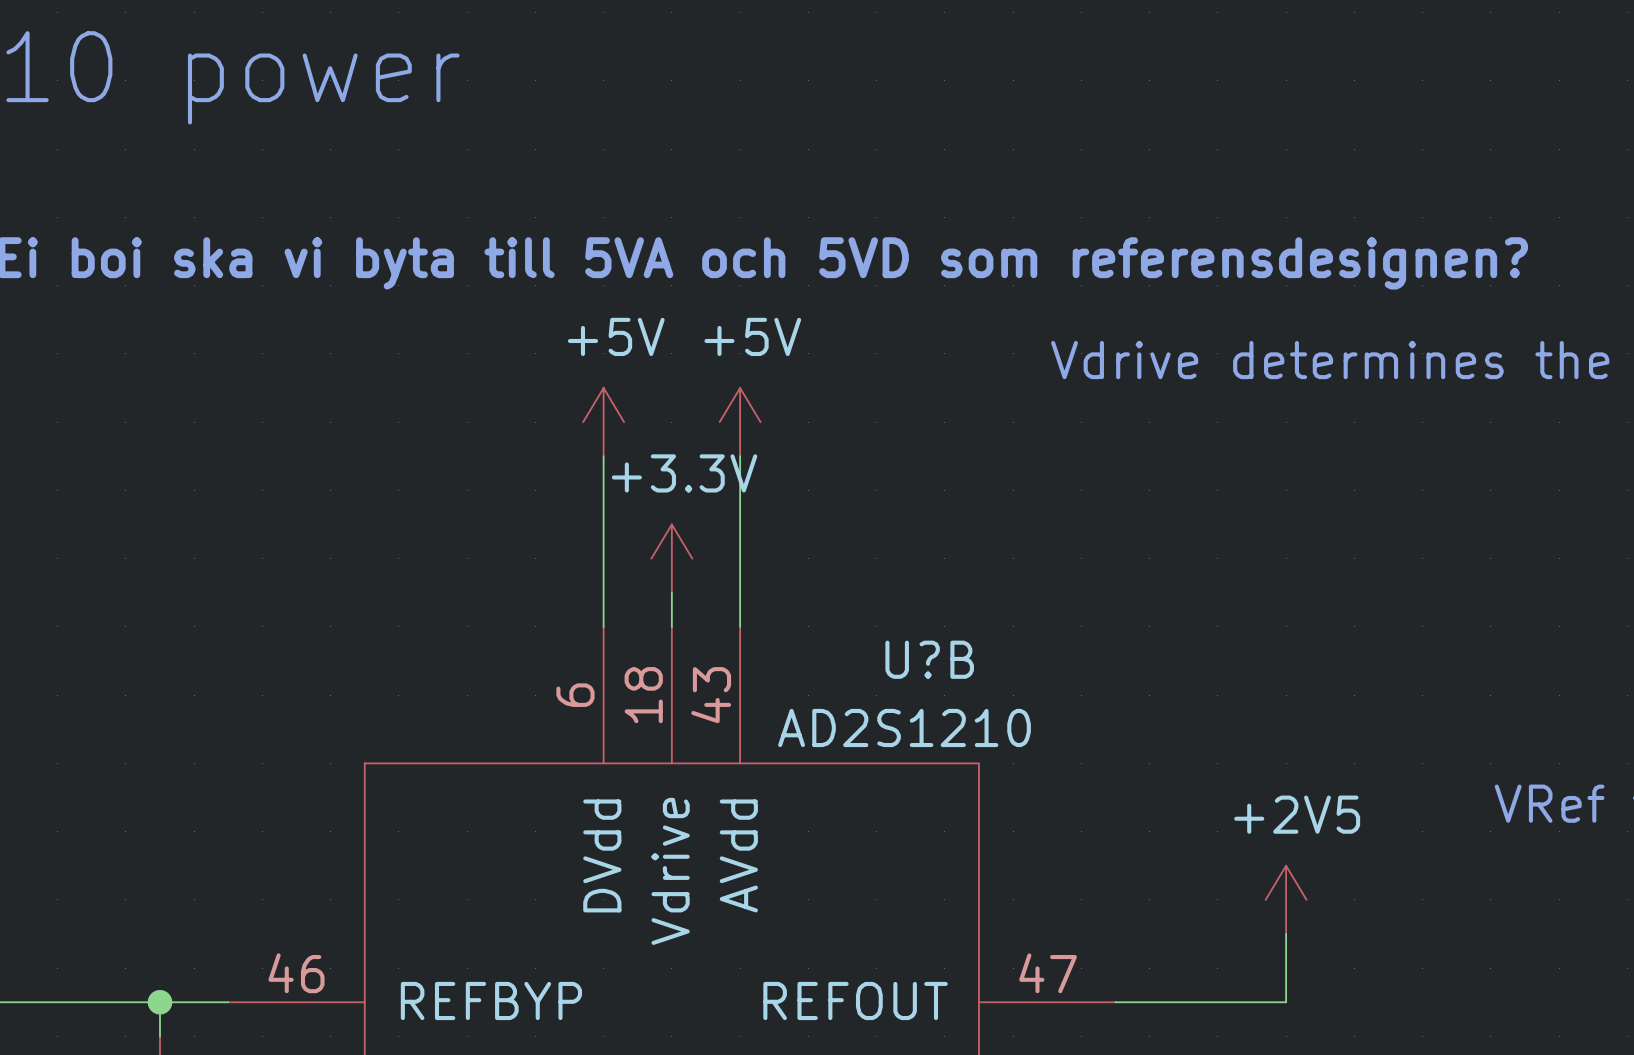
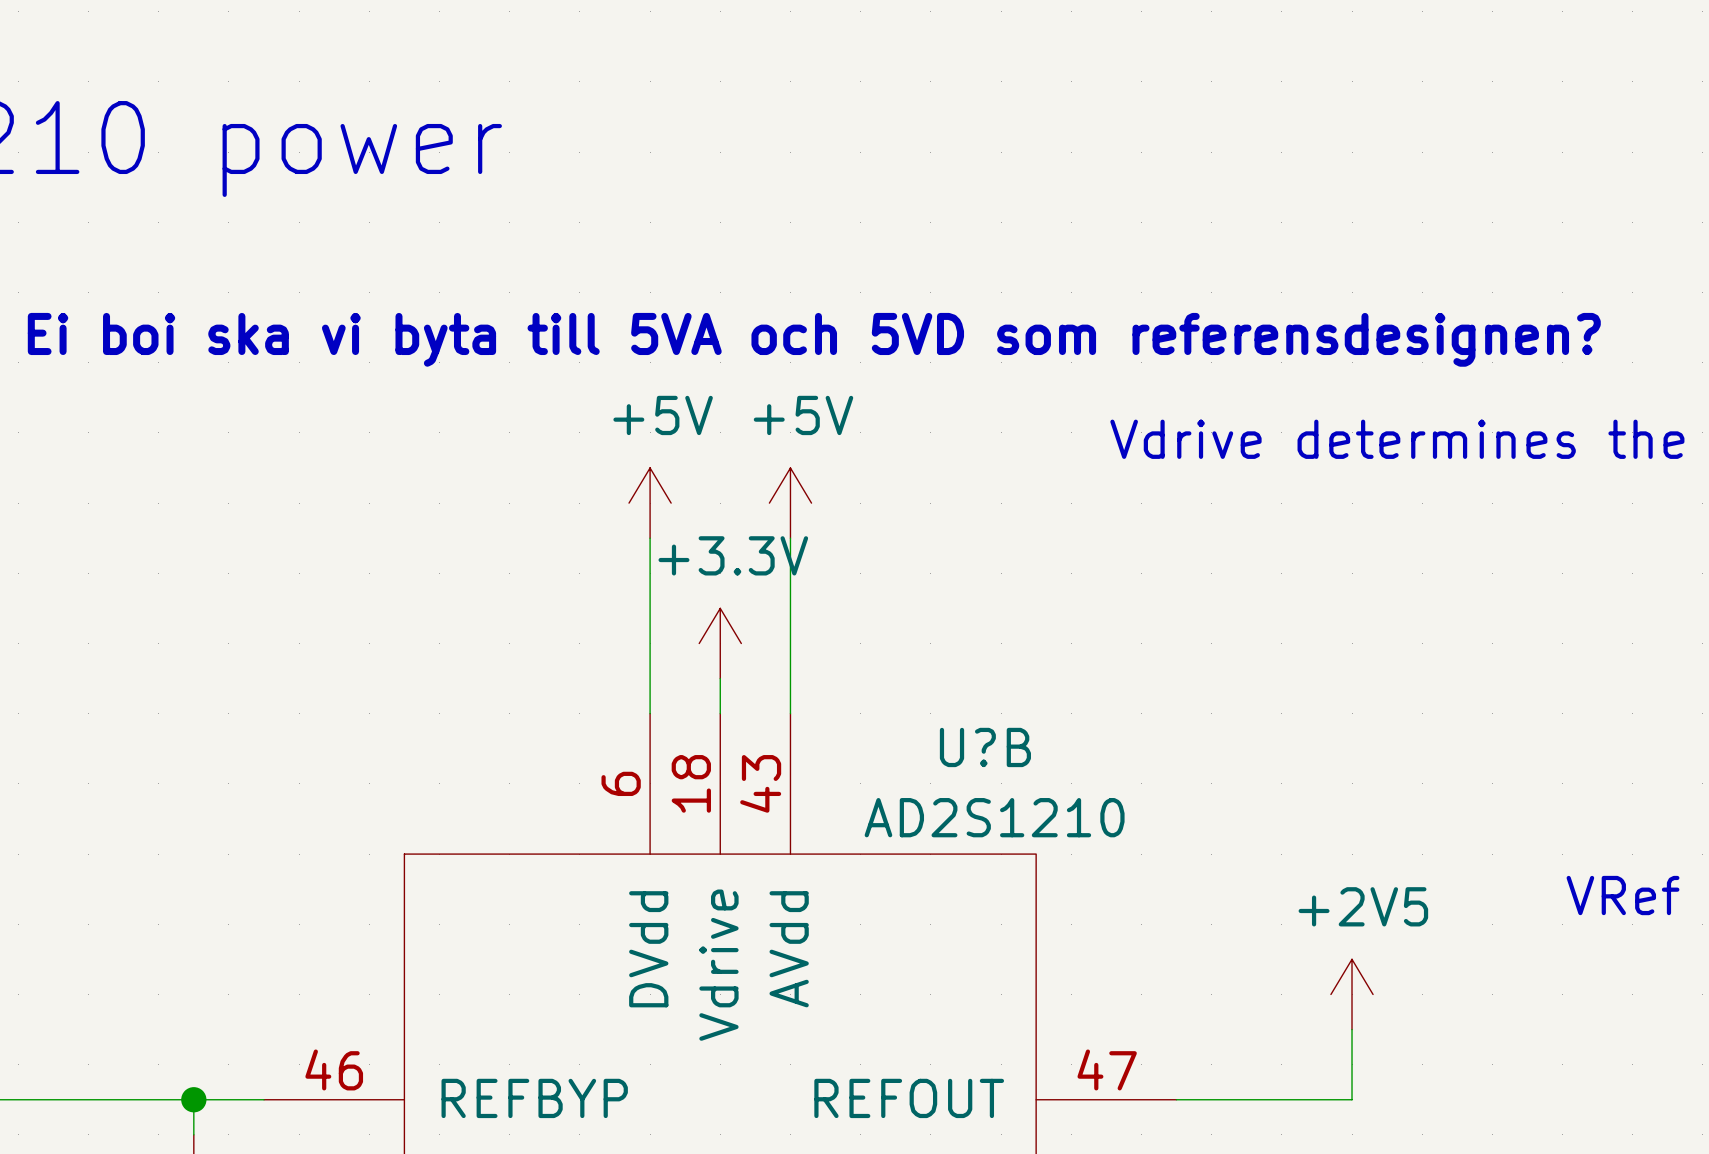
U?B value position: AD2S1210 (904, 727) -> AD2S1210 (994, 817)

